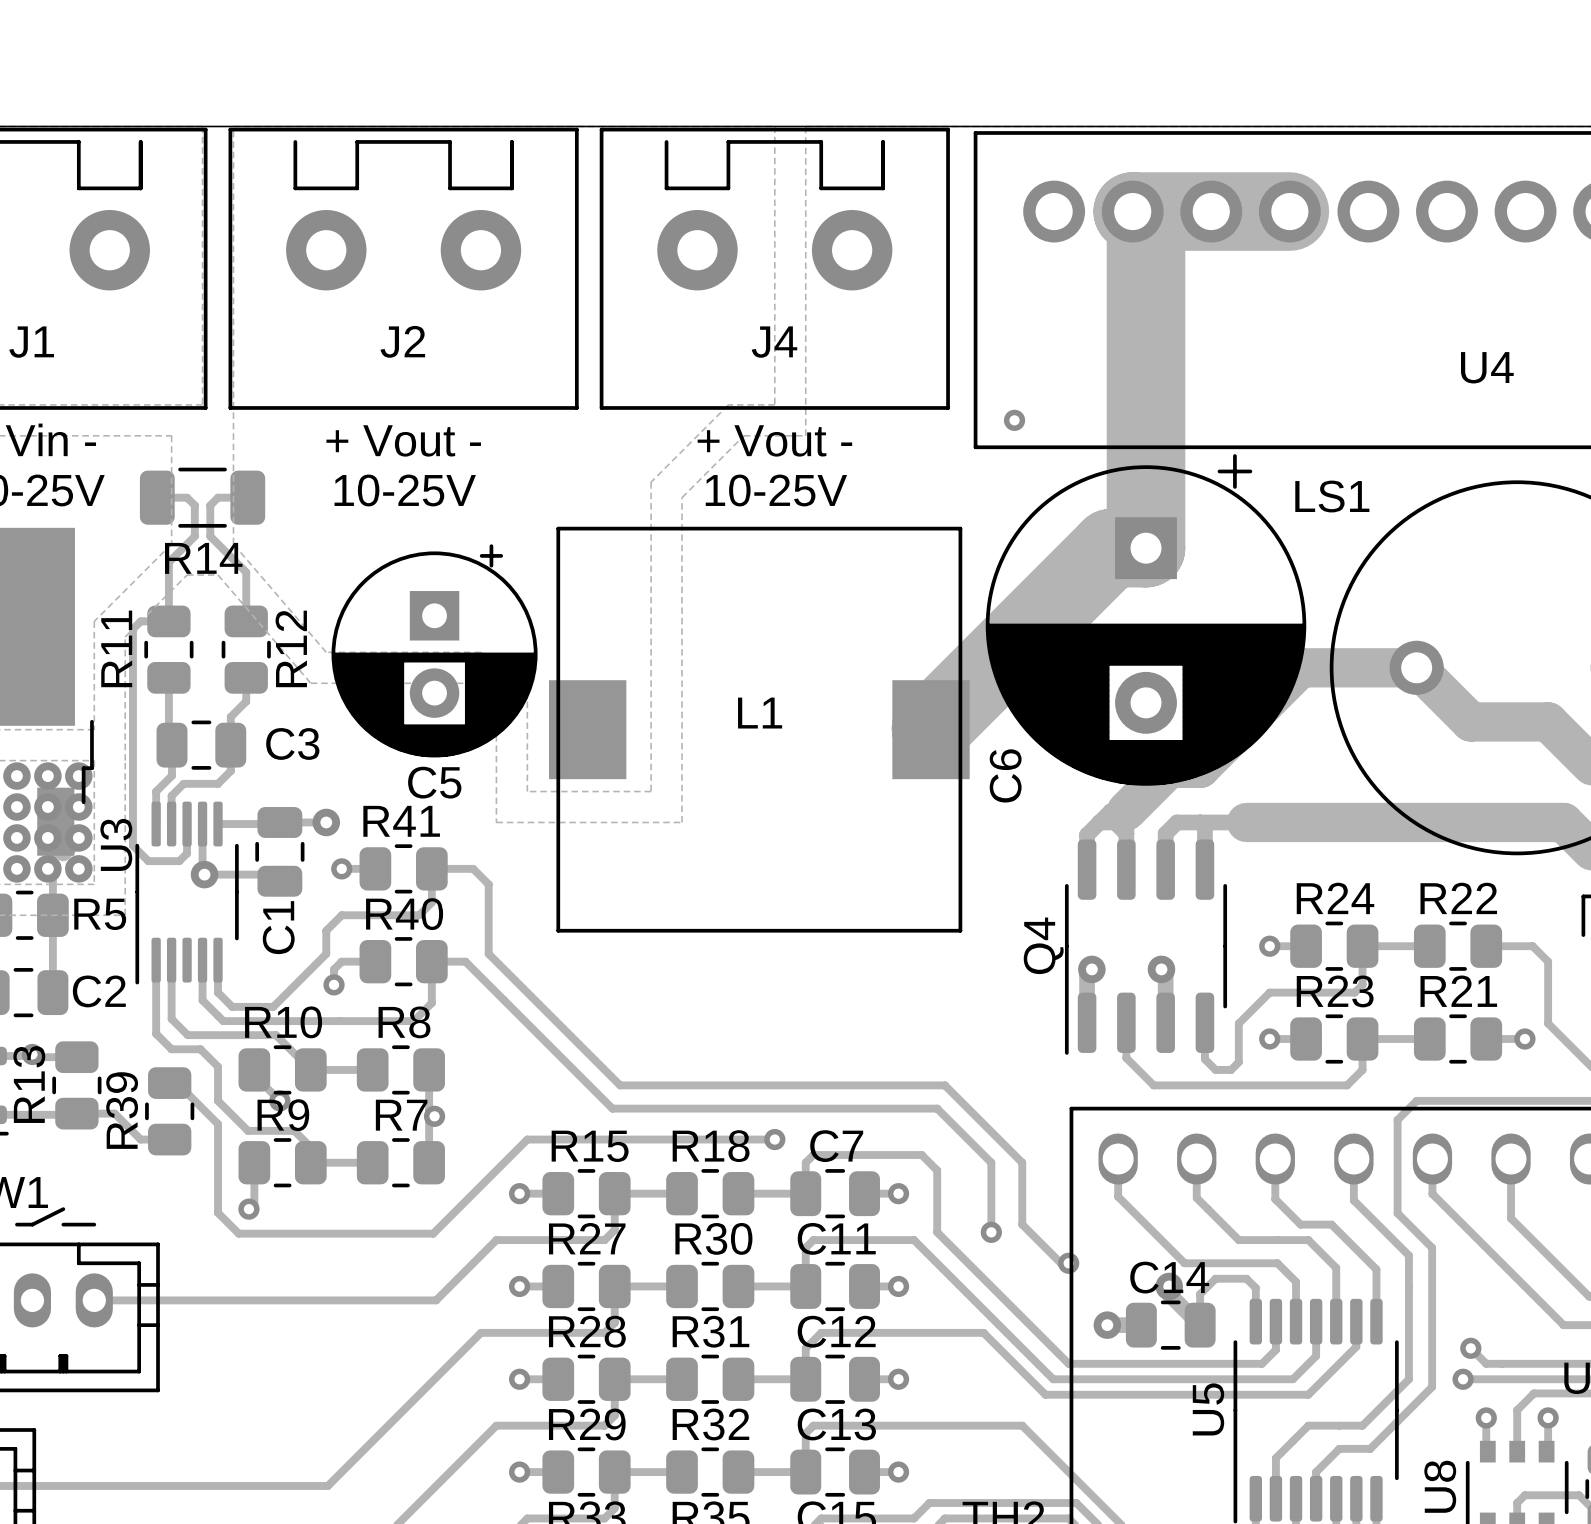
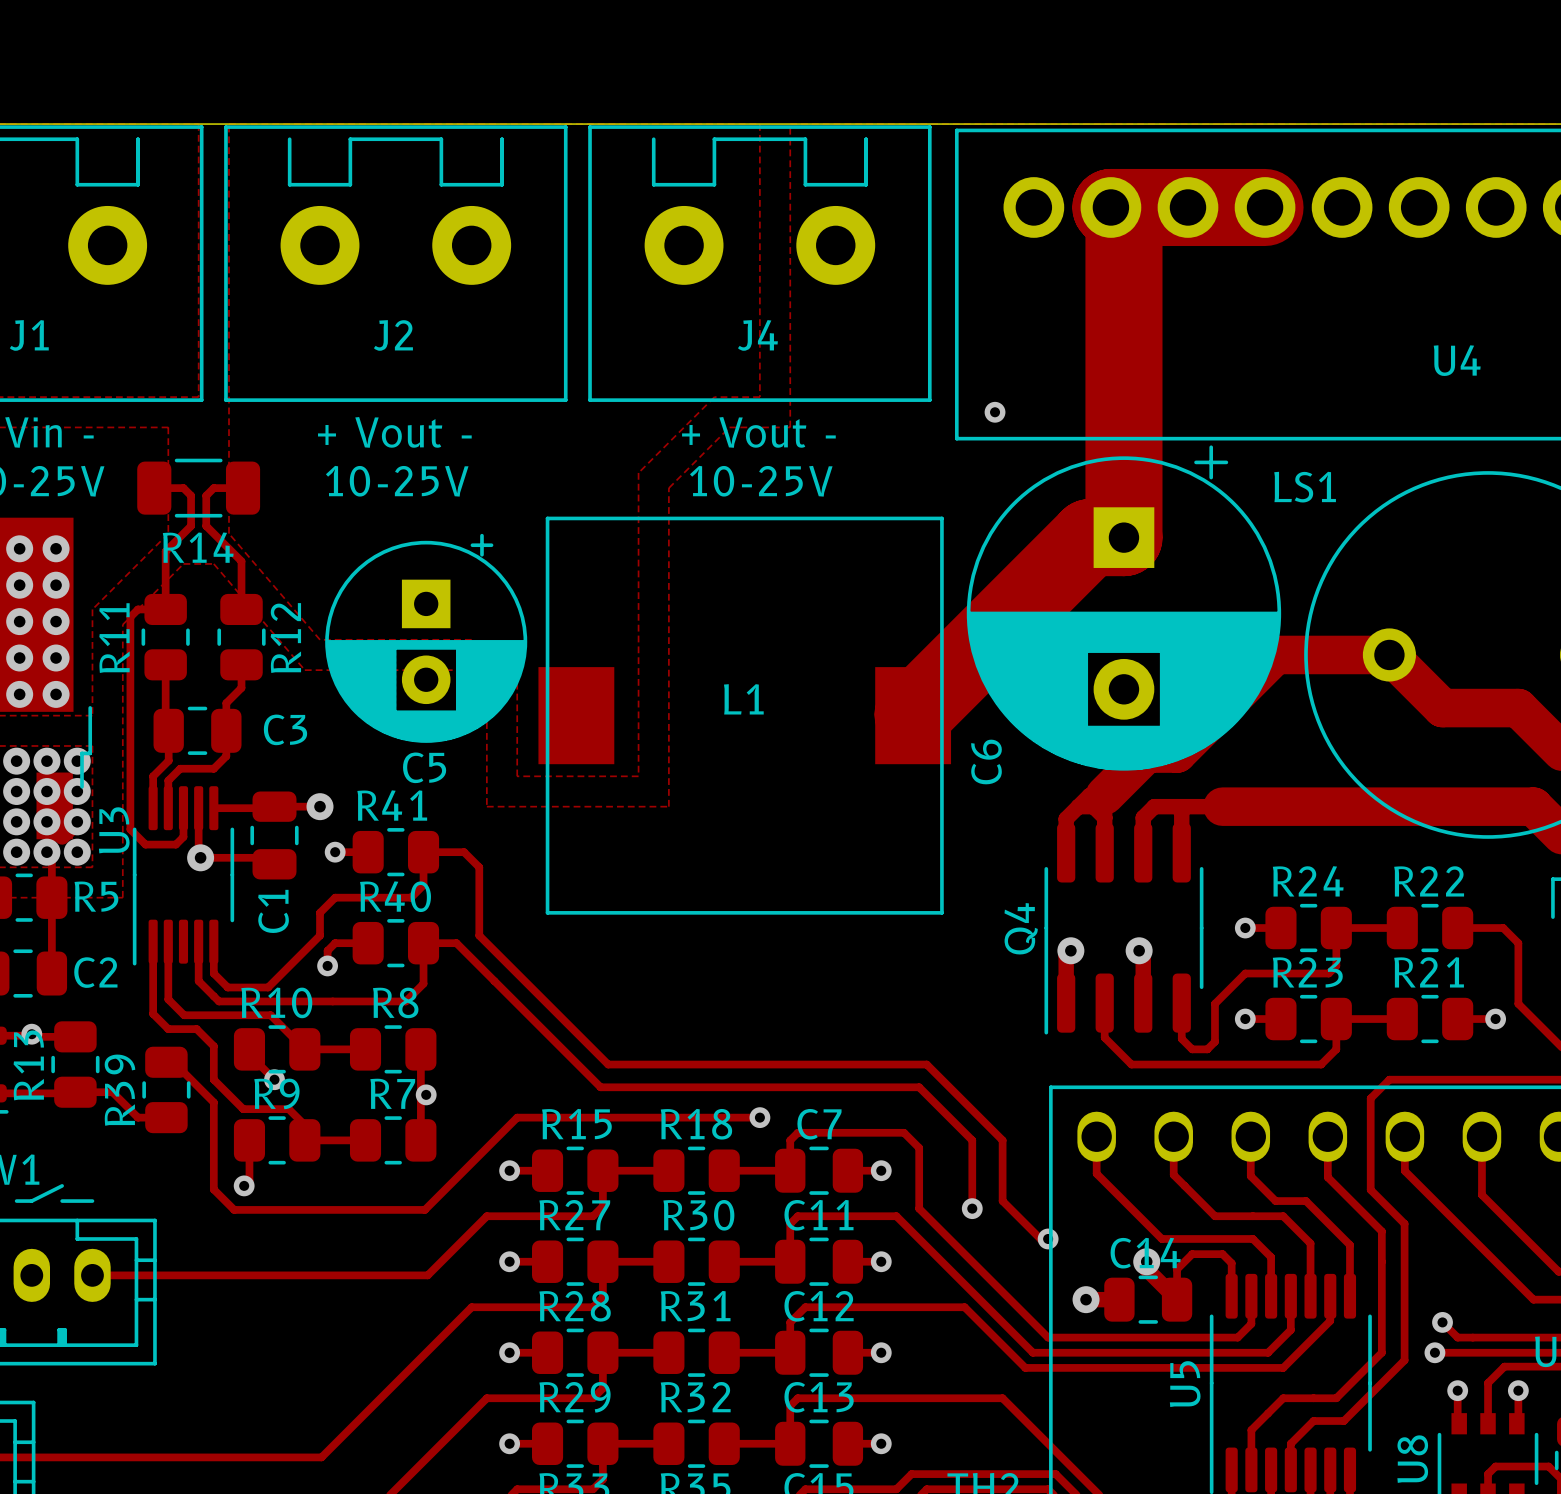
via: none -> (19, 548)
via: none -> (56, 548)
via: none -> (19, 585)
via: none -> (56, 585)
via: none -> (19, 621)
via: none -> (56, 621)
via: none -> (19, 658)
via: none -> (56, 658)
via: none -> (19, 694)
via: none -> (56, 694)

